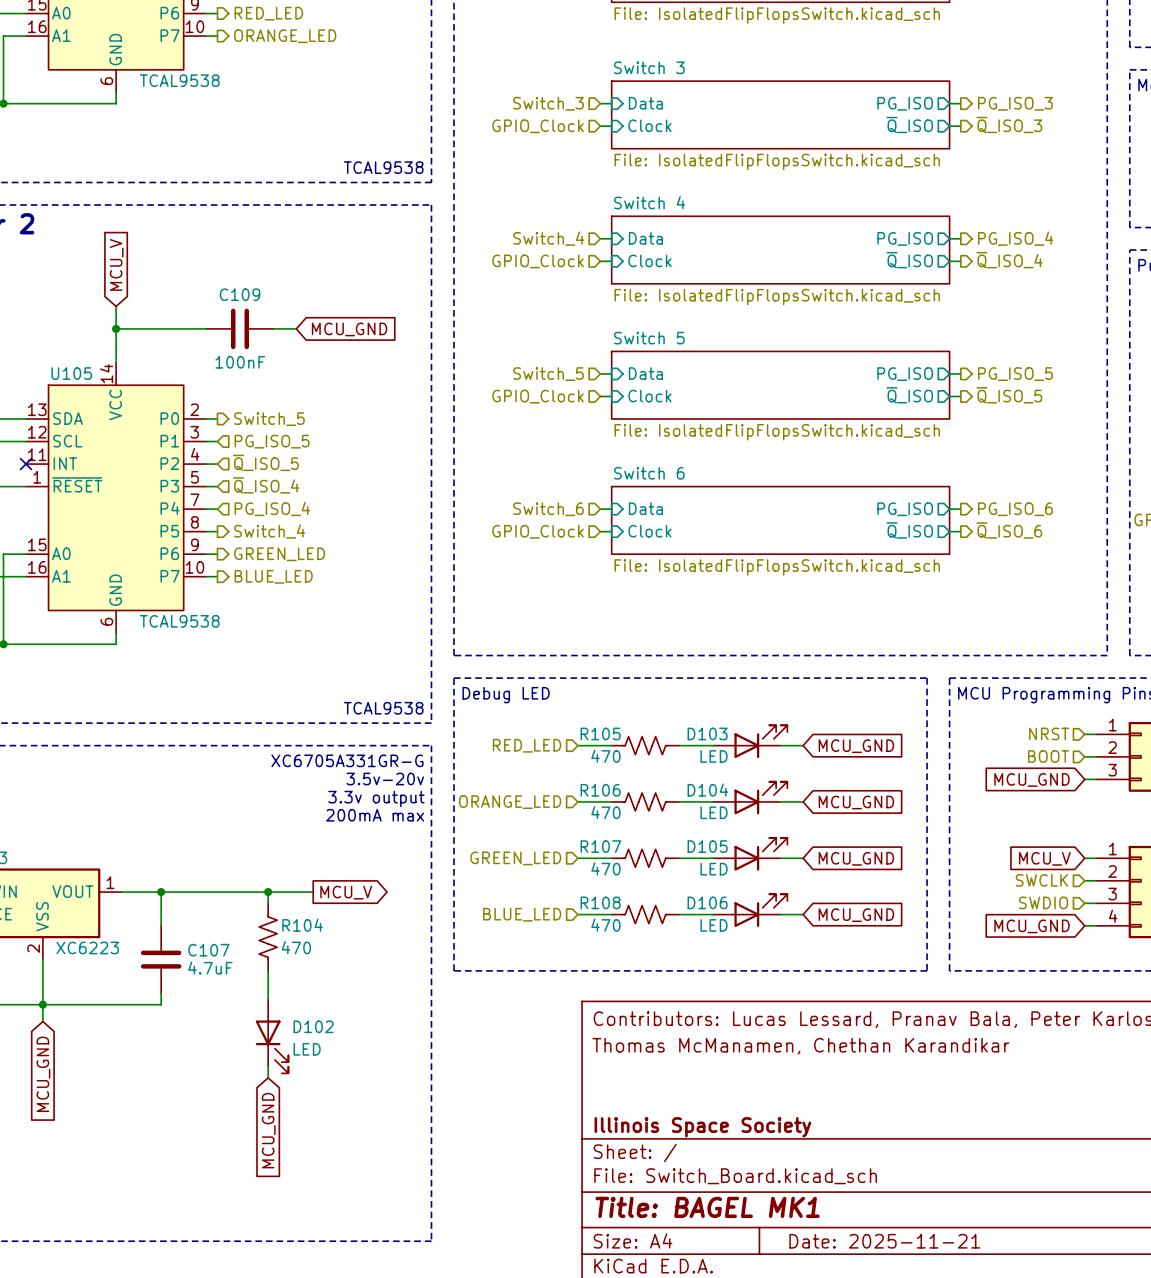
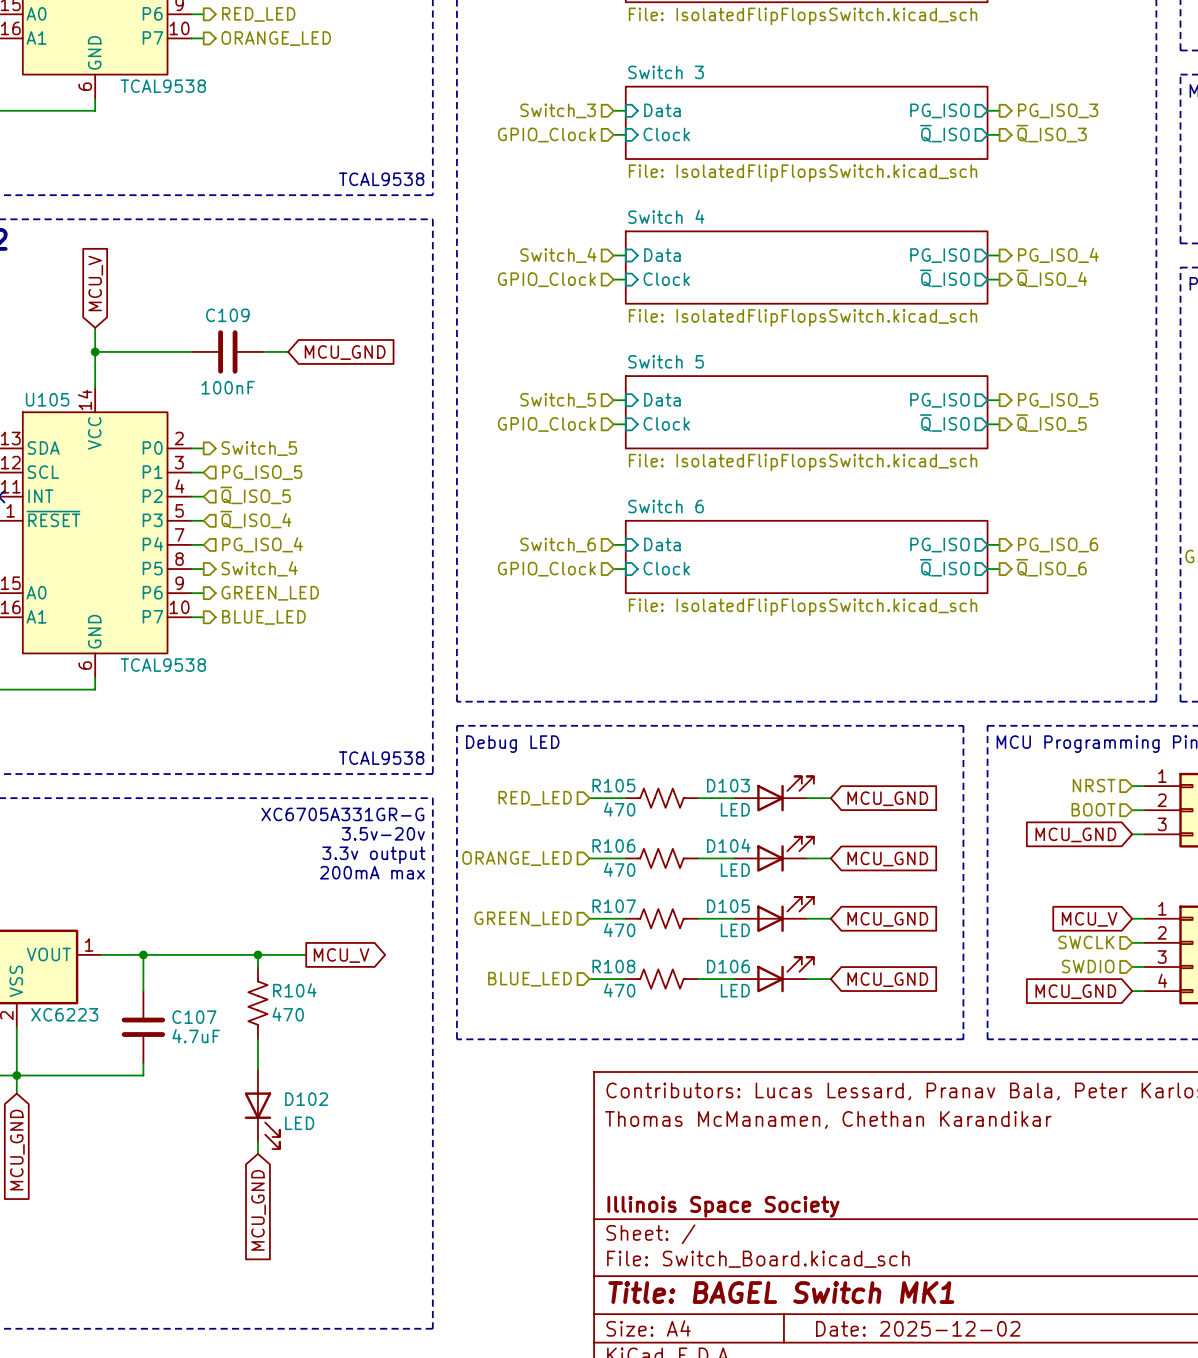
title block: Title: BAGEL MK1 (707, 1207) -> Title: BAGEL Switch MK1 (781, 1292)
title block: Date: 2025-11-21 (884, 1241) -> Date: 2025-12-02 (918, 1328)

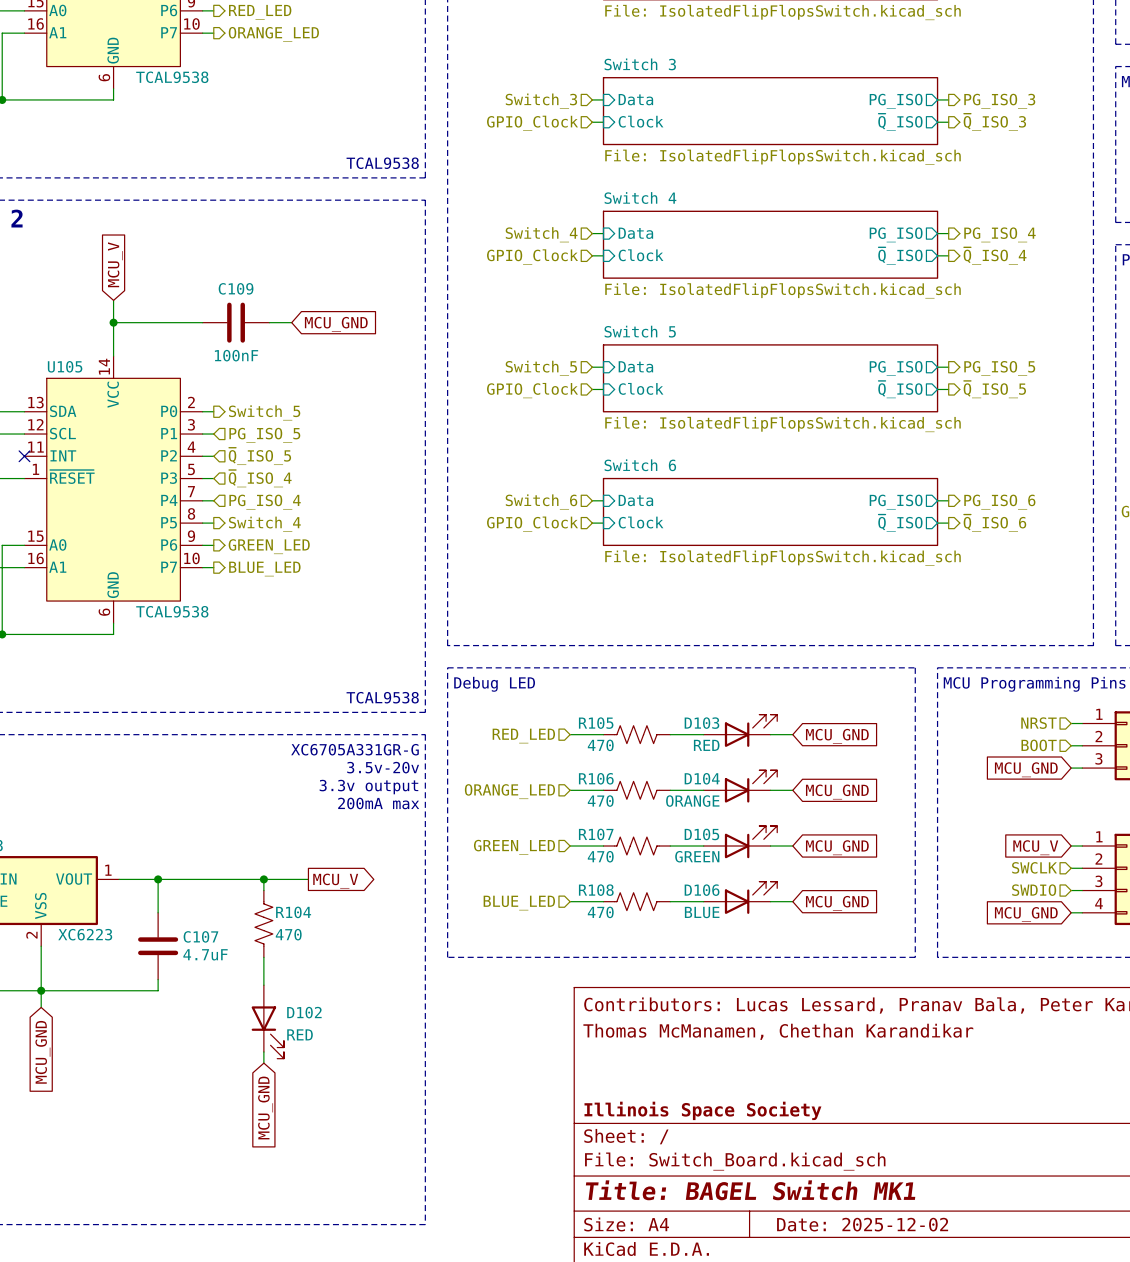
D103 value: LED (735, 809) -> RED (706, 745)
D104 value: LED (735, 870) -> ORANGE (692, 801)
D105 value: LED (735, 930) -> GREEN (697, 856)
D106 value: LED (735, 990) -> BLUE (702, 912)
D102 value: LED (299, 1123) -> RED (300, 1034)

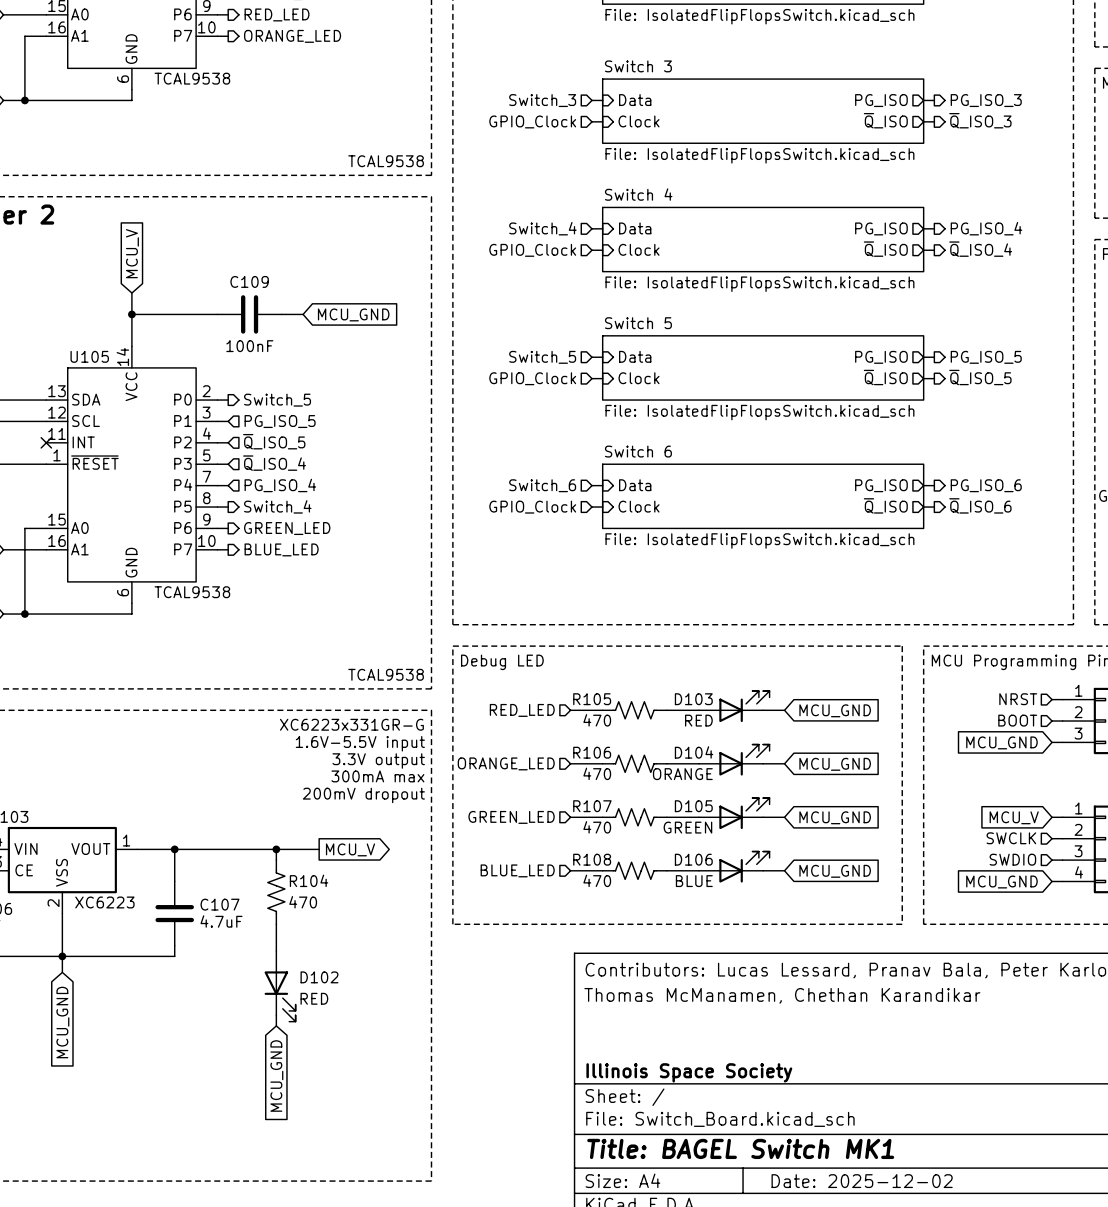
text: XC6705A331GR-G (355, 749) -> XC6223x331GR-G (351, 724)
text: 3.5v-20v (383, 767) -> 1.6V-5.5V input (360, 743)
text: 3.3v output (368, 787) -> 3.3V output (378, 760)
text: 200mA max (378, 803) -> 300mA max (377, 776)
text: none -> 200mV dropout (363, 795)

